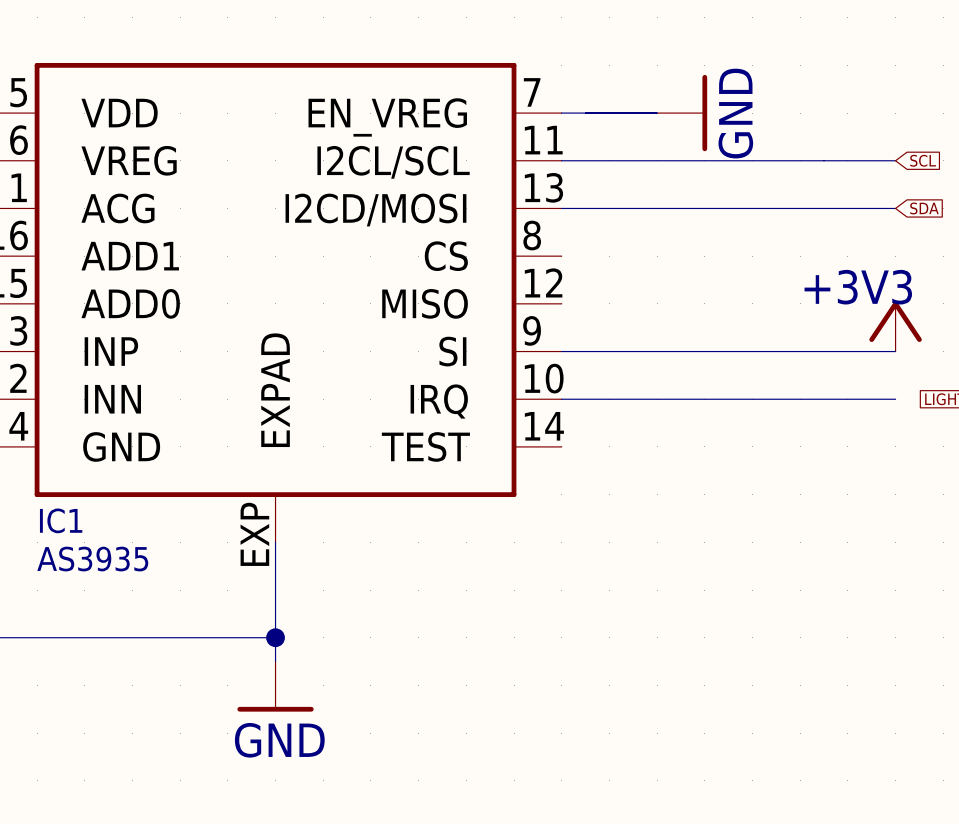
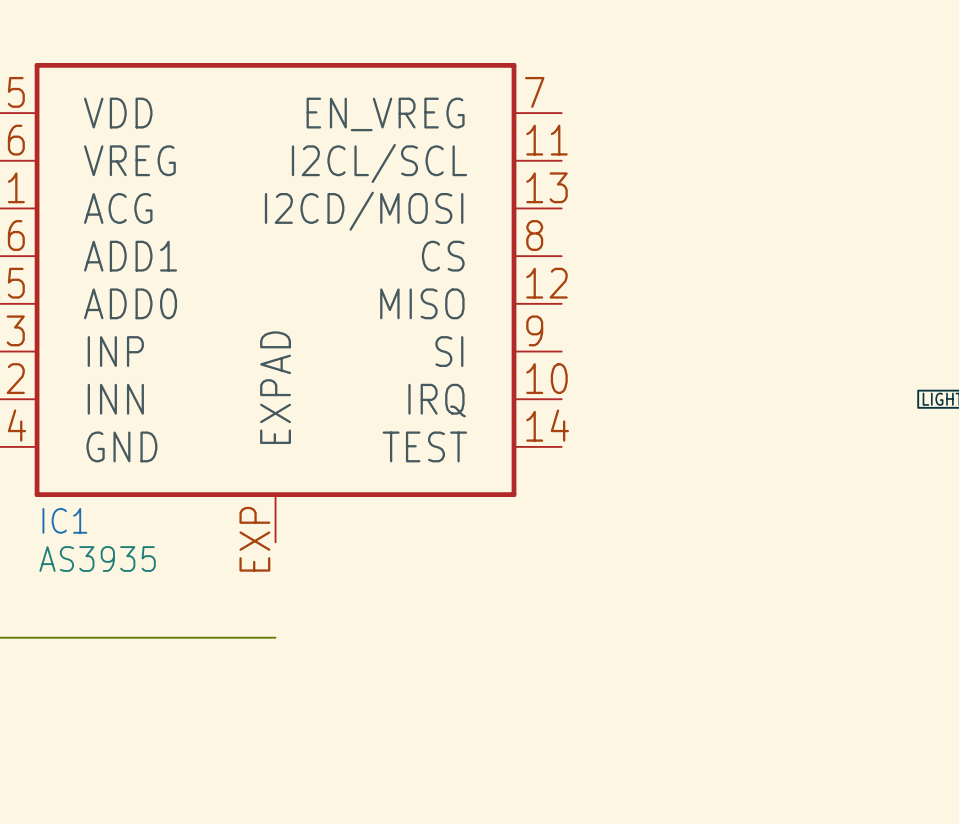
wire: (561, 113) (657, 113) -> none
power symbol: GND (682, 113) -> none
wire: (561, 160) (895, 160) -> none
global label: SCL (923, 160) -> none
wire: (561, 208) (895, 208) -> none
global label: SDA (924, 208) -> none
power symbol: +3V3 (895, 326) -> none
wire: (561, 351) (895, 351) -> none
wire: (561, 399) (895, 399) -> none
wire: (275, 542) (275, 661) -> none
junction: (275, 637) -> none
power symbol: GND (275, 686) -> none

